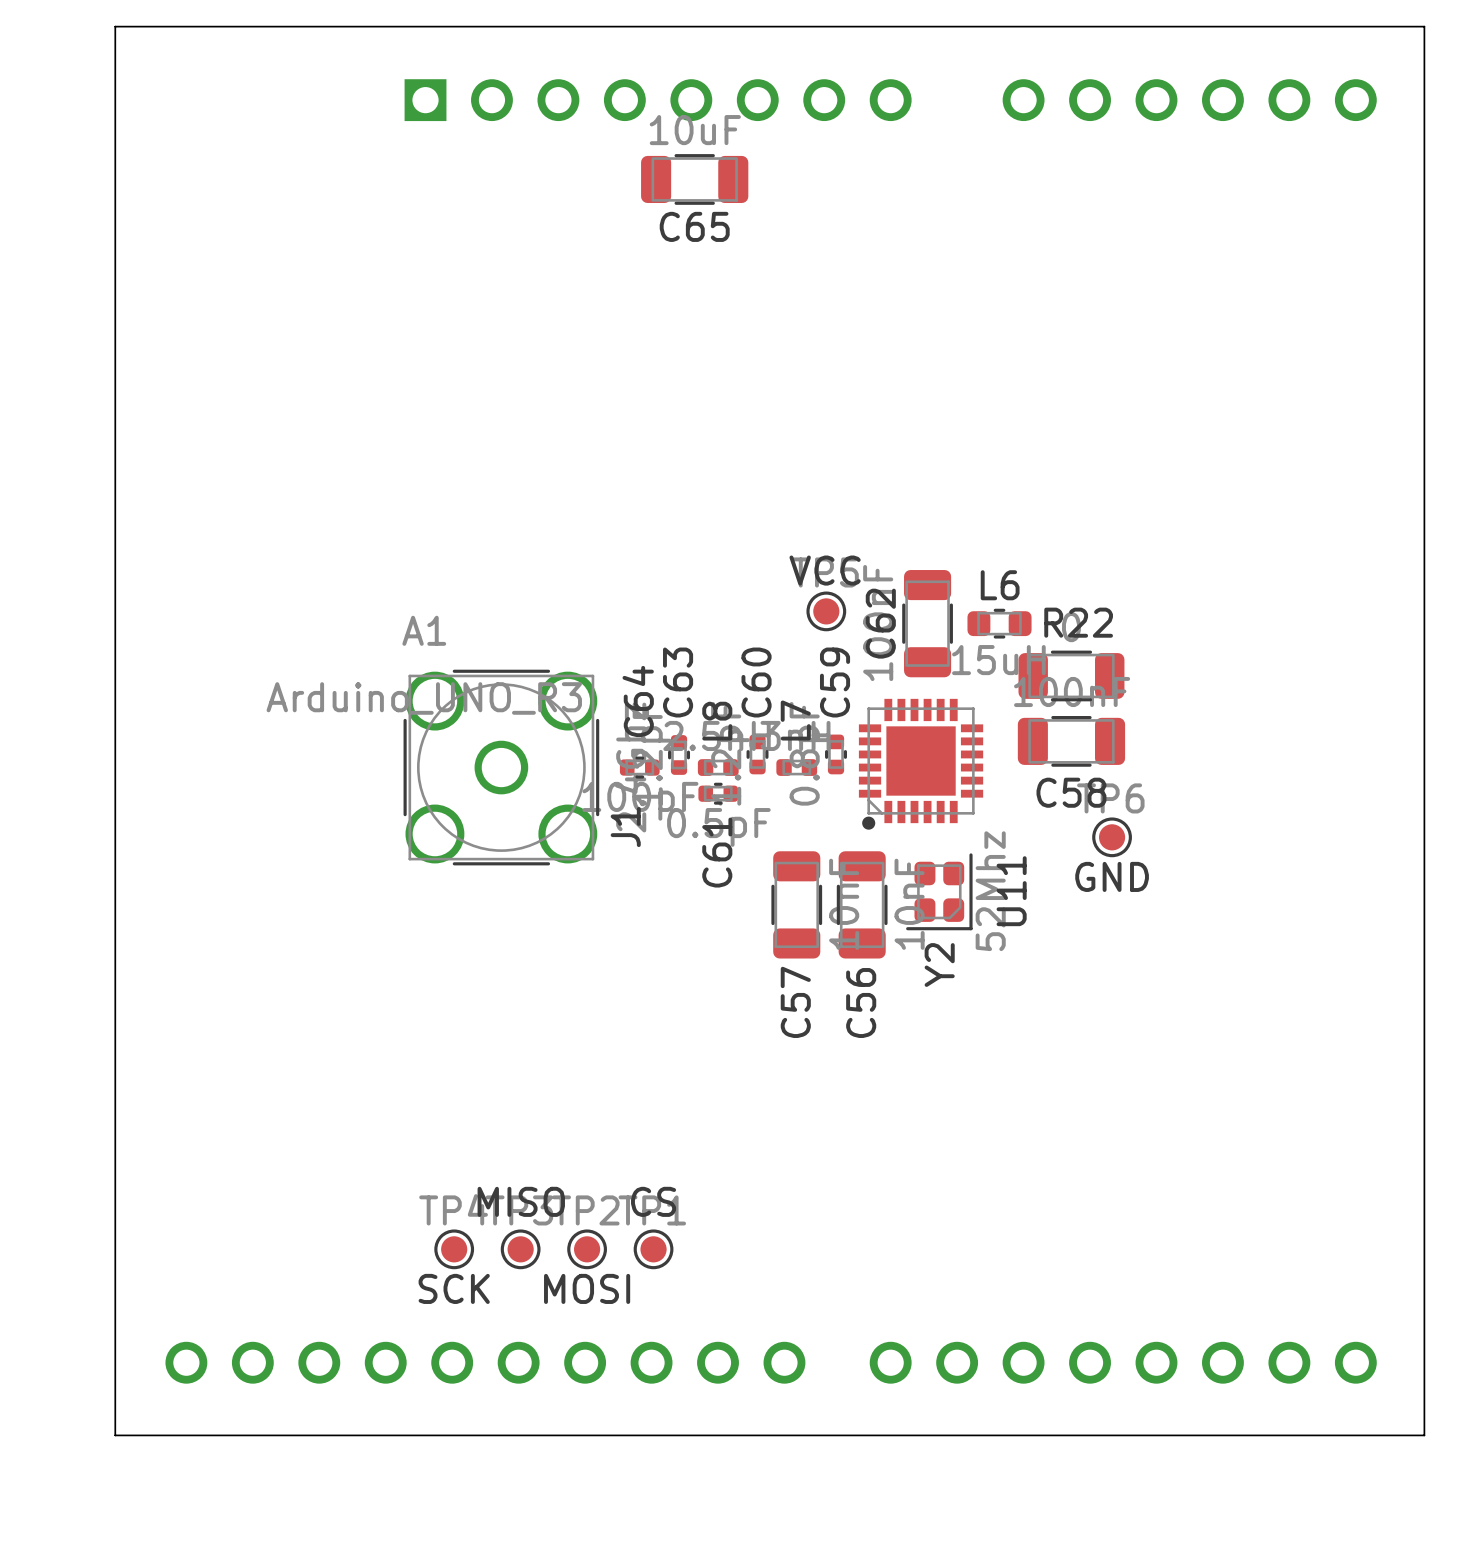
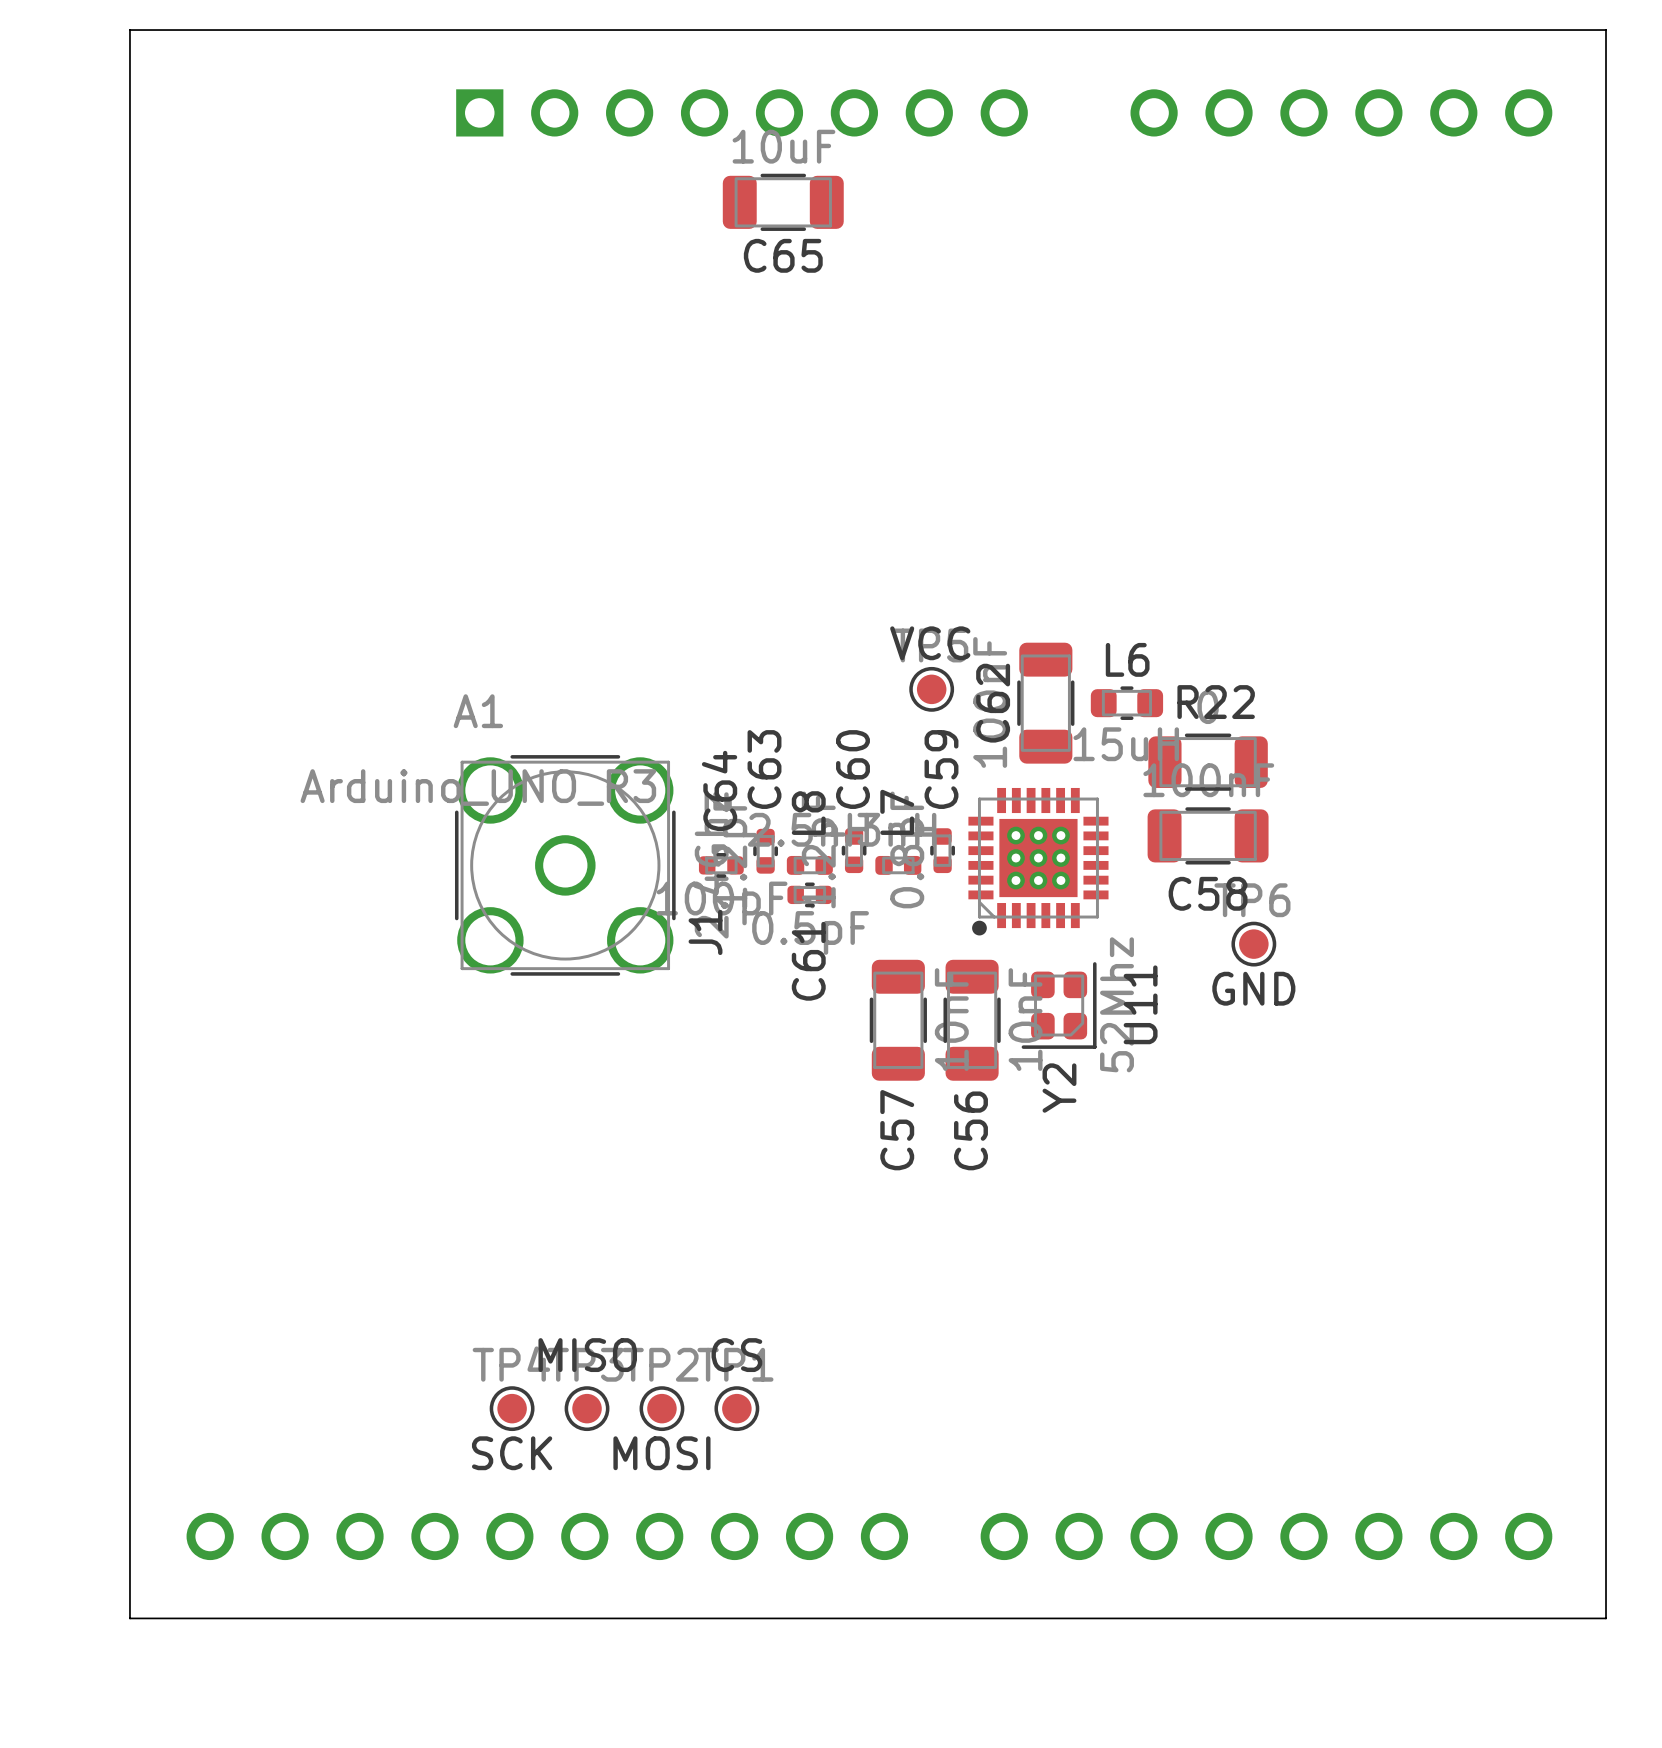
U11 footprint: [858, 698, 984, 830] -> [968, 787, 1109, 936]

